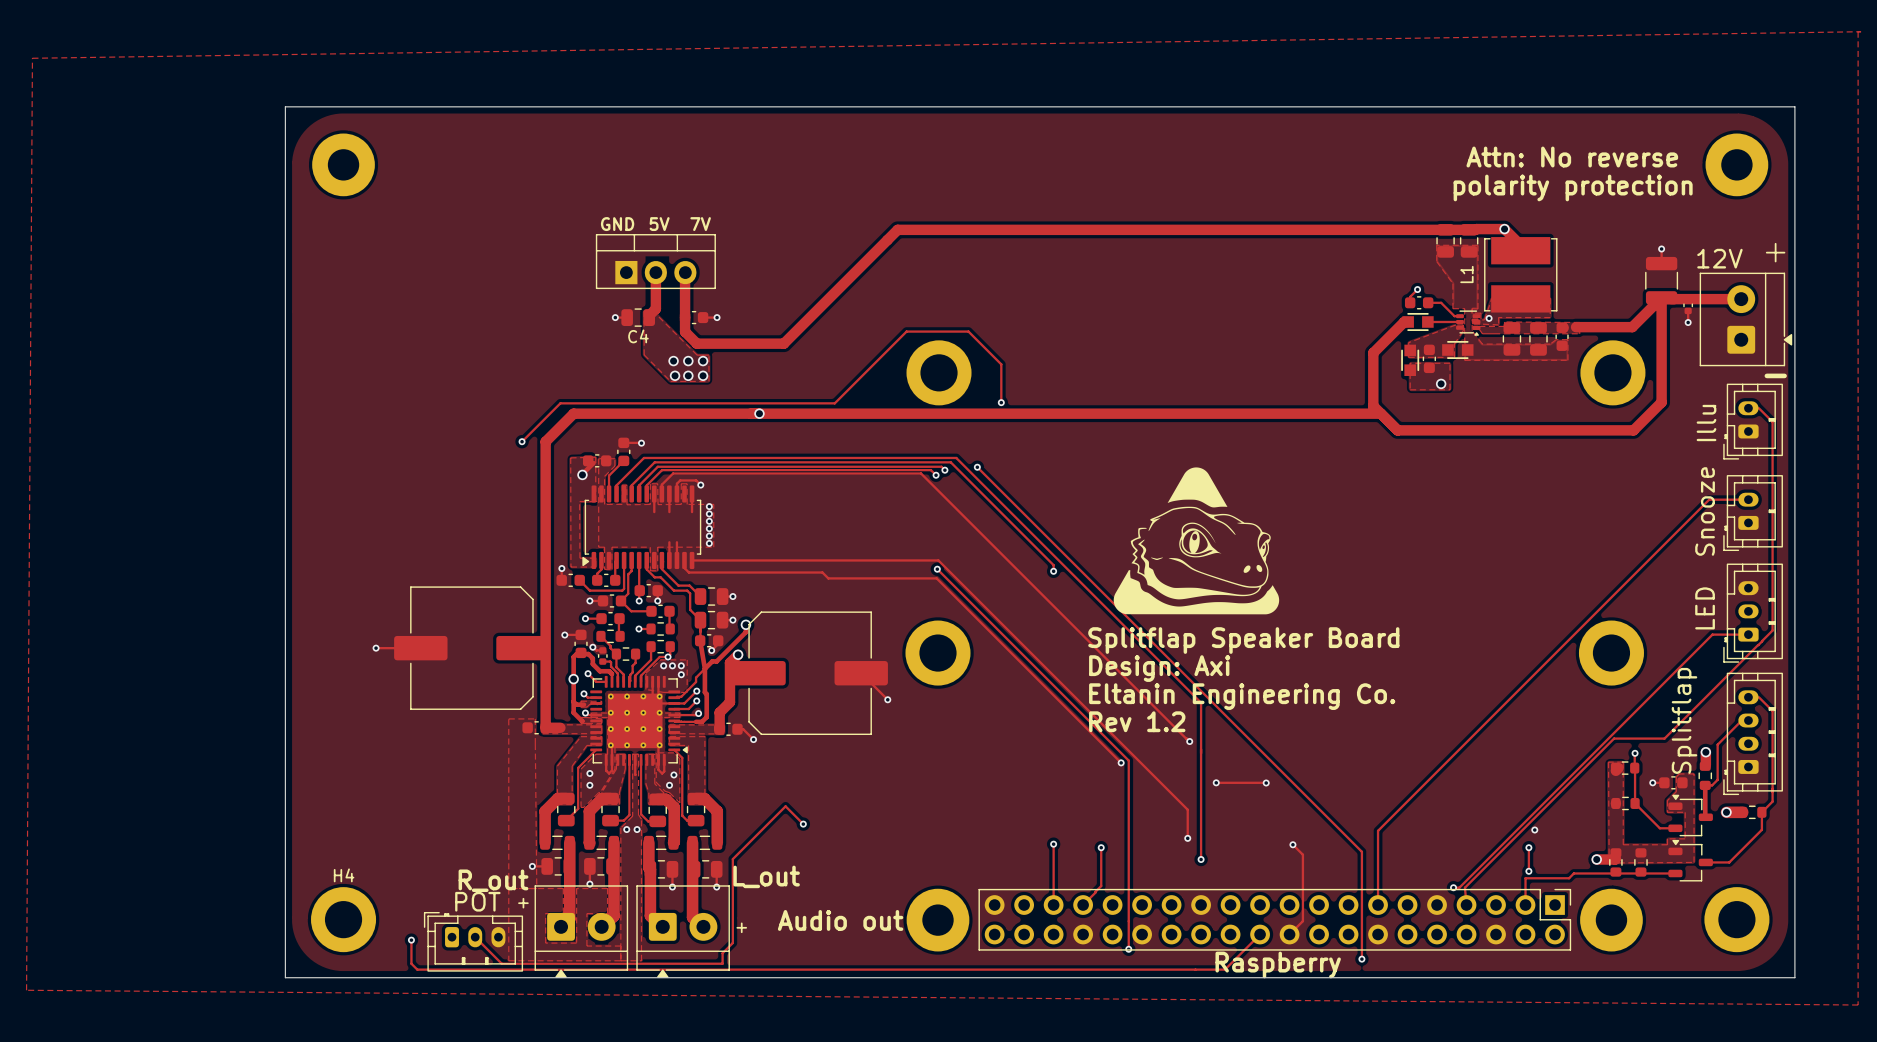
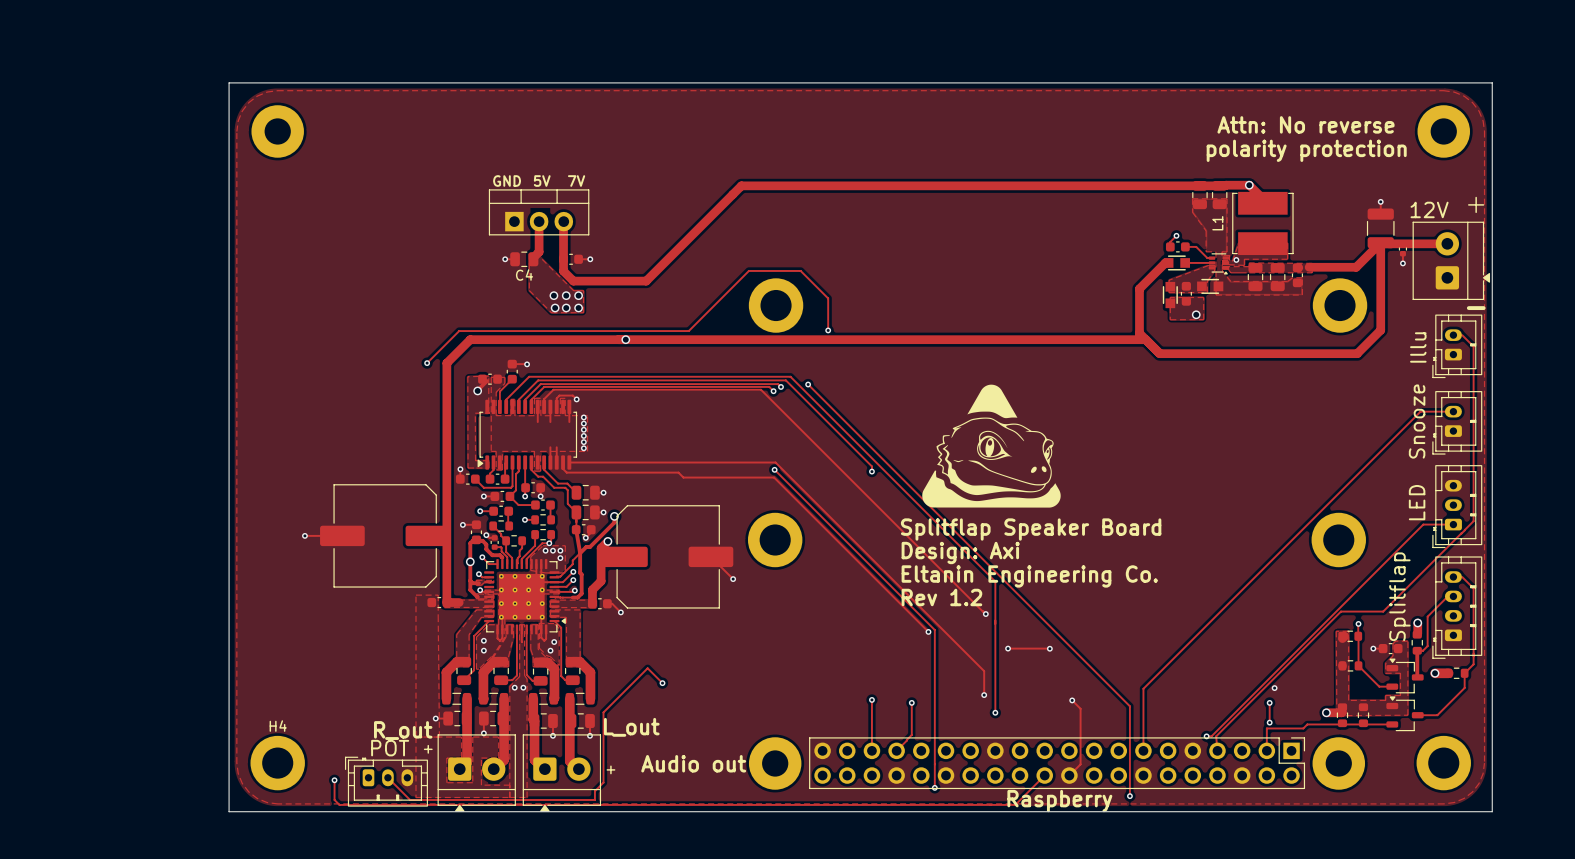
zone outline: (1858, 31) (1858, 1005) (26, 990) (32, 58) (1861, 31) (1858, 31) -> (277, 90) (257, 96) (248, 102) (242, 111) (236, 131) (236, 763) (242, 783) (257, 798) (277, 803) (1443, 803) (1464, 798) (1479, 783) (1484, 763) (1484, 131) (1479, 111) (1464, 96) (1443, 90) (277, 90)

